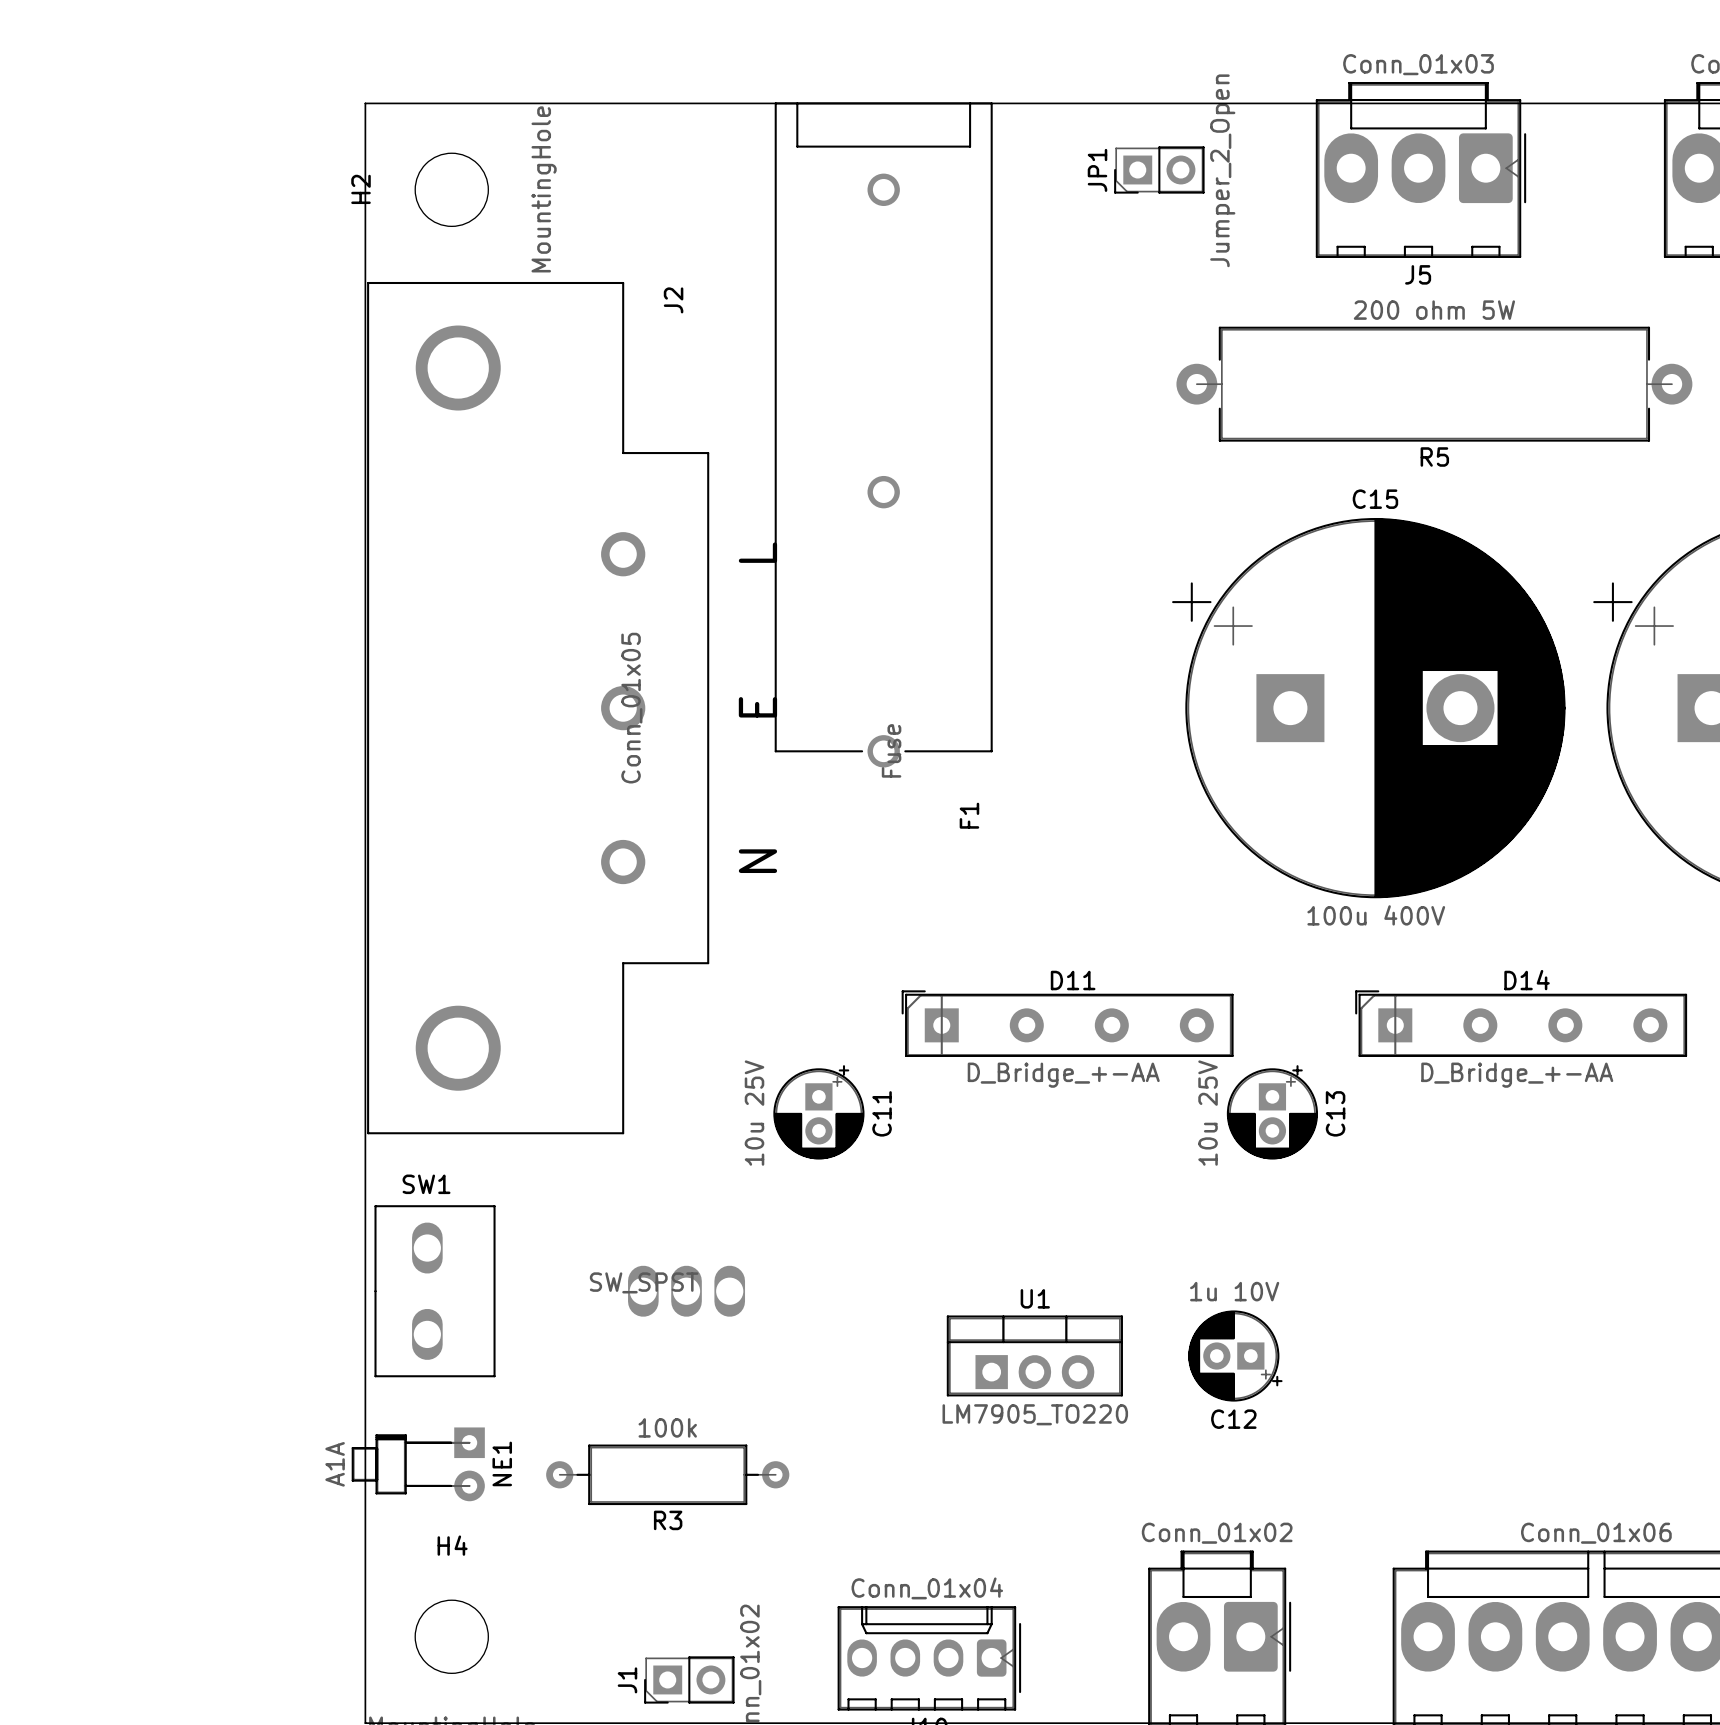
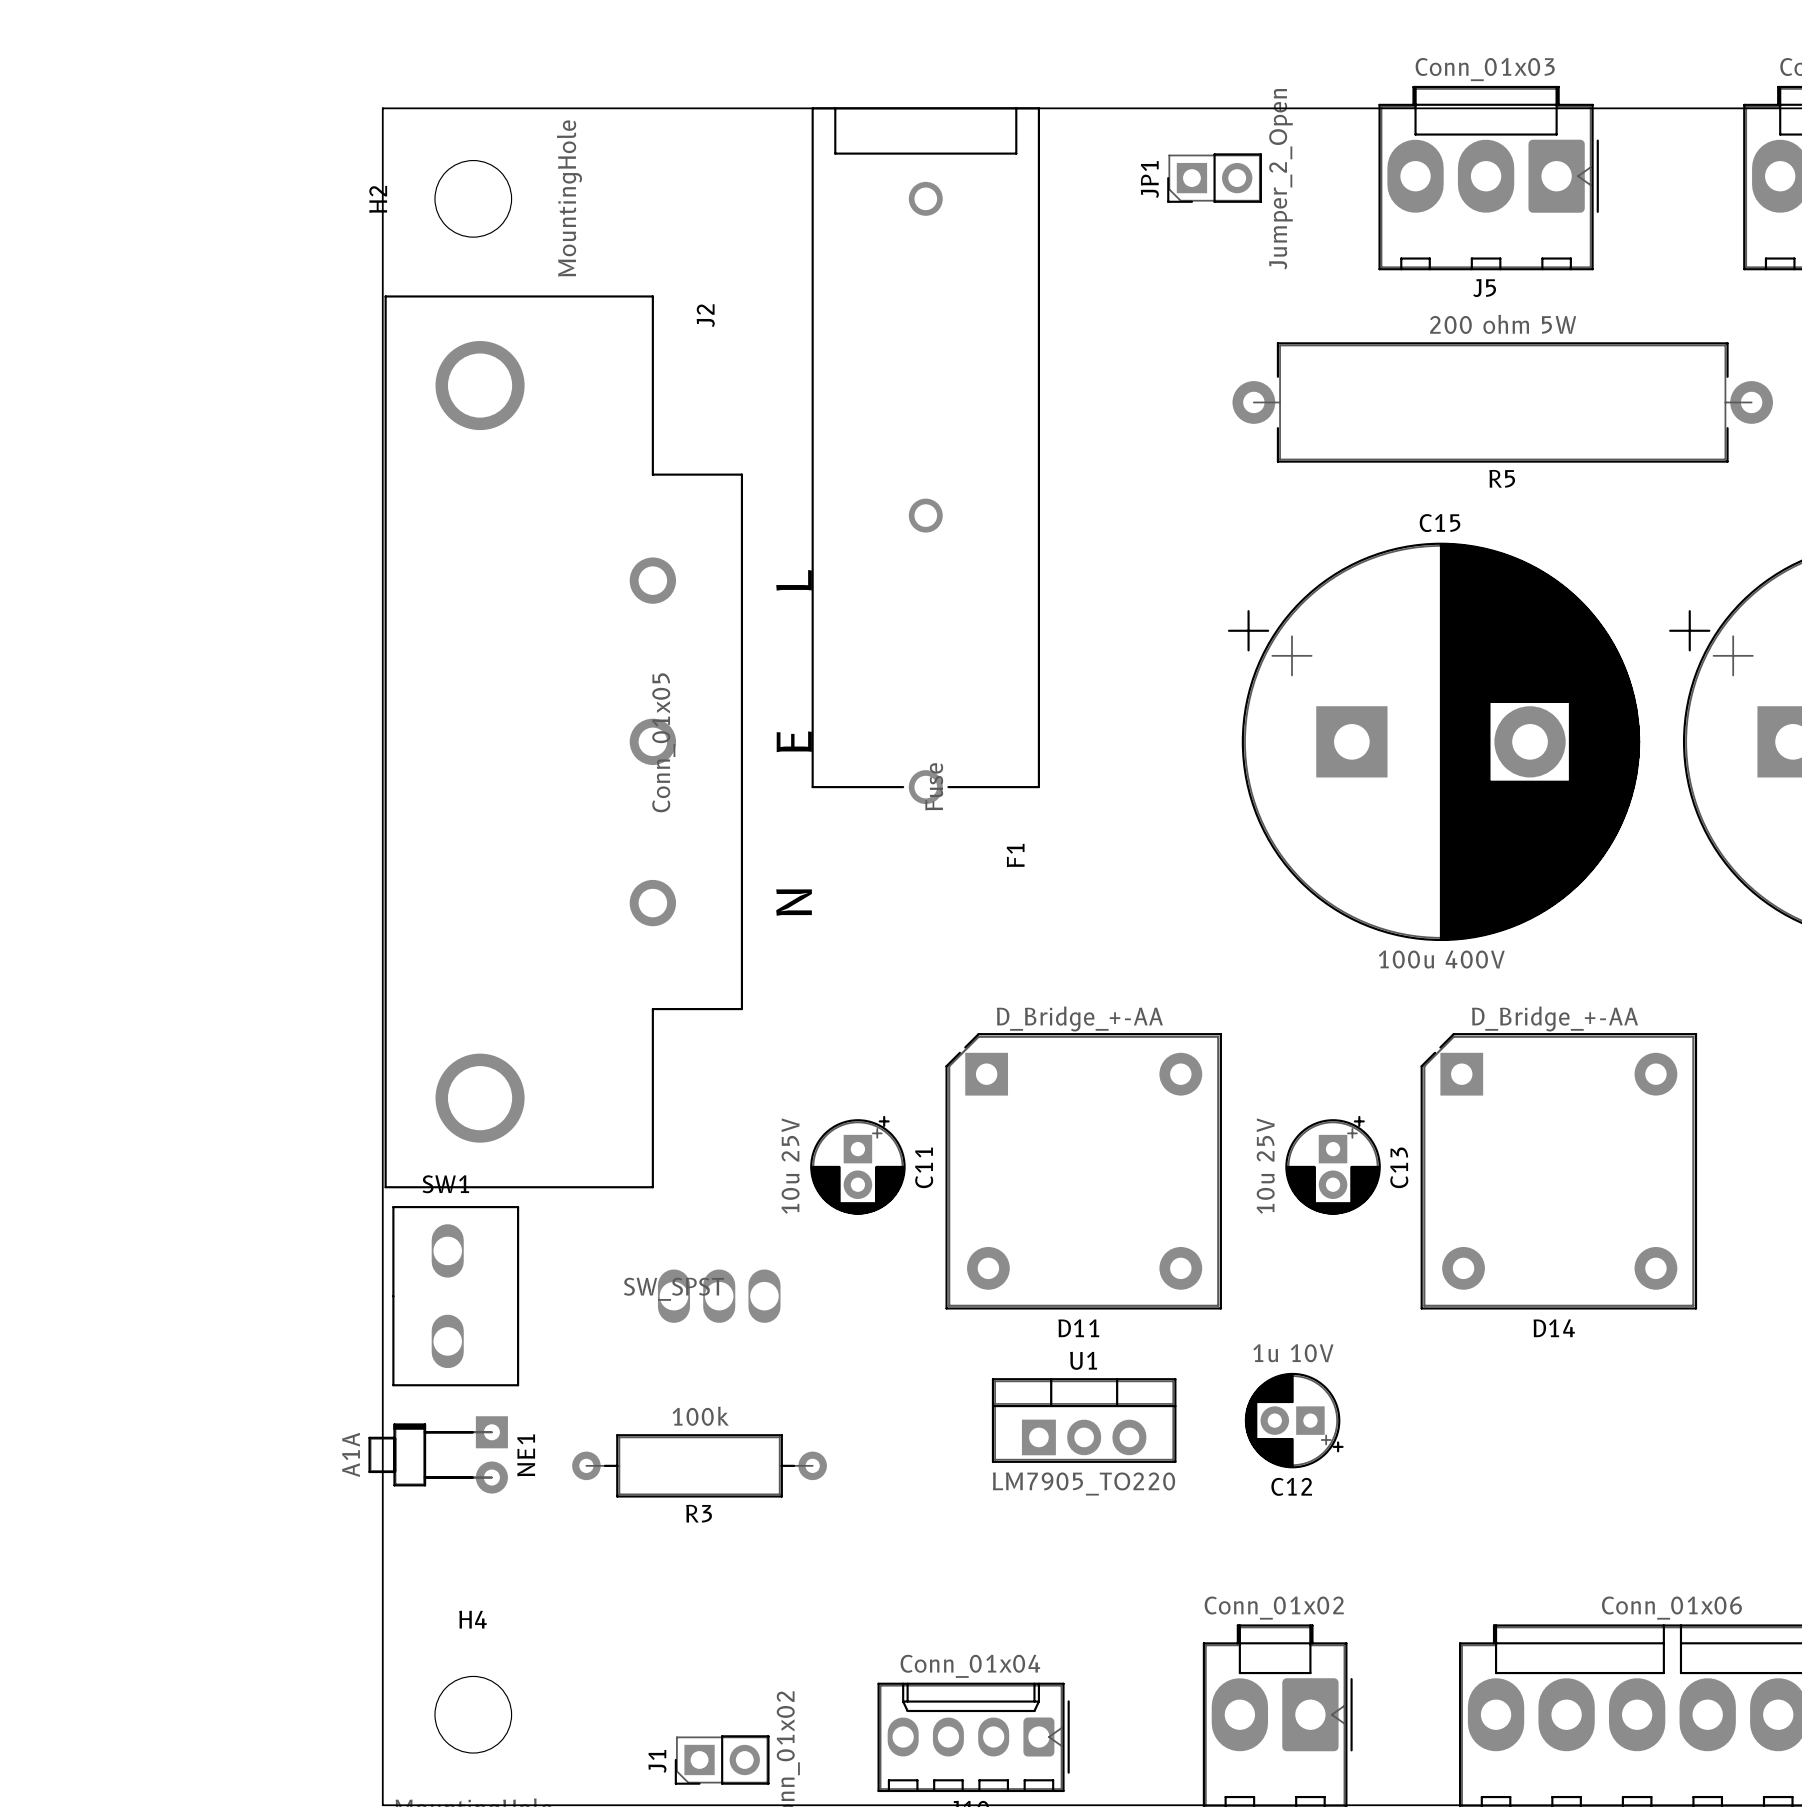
D11 name position: D11 (1073, 980) -> D11 (1078, 1328)
D14 name position: D14 (1527, 980) -> D14 (1554, 1328)
D11 footprint: [901, 990, 1234, 1057] -> [945, 1033, 1222, 1310]
D14 footprint: [1355, 990, 1688, 1057] -> [1420, 1033, 1698, 1310]
D11 value position: D_Bridge_+-AA (1063, 1075) -> D_Bridge_+-AA (1079, 1018)
D14 value position: D_Bridge_+-AA (1517, 1075) -> D_Bridge_+-AA (1555, 1018)
SW1 position: (559, 1291) -> (586, 1296)
NE1 position: (418, 1464) -> (438, 1454)
R3 position: (667, 1474) -> (699, 1465)

